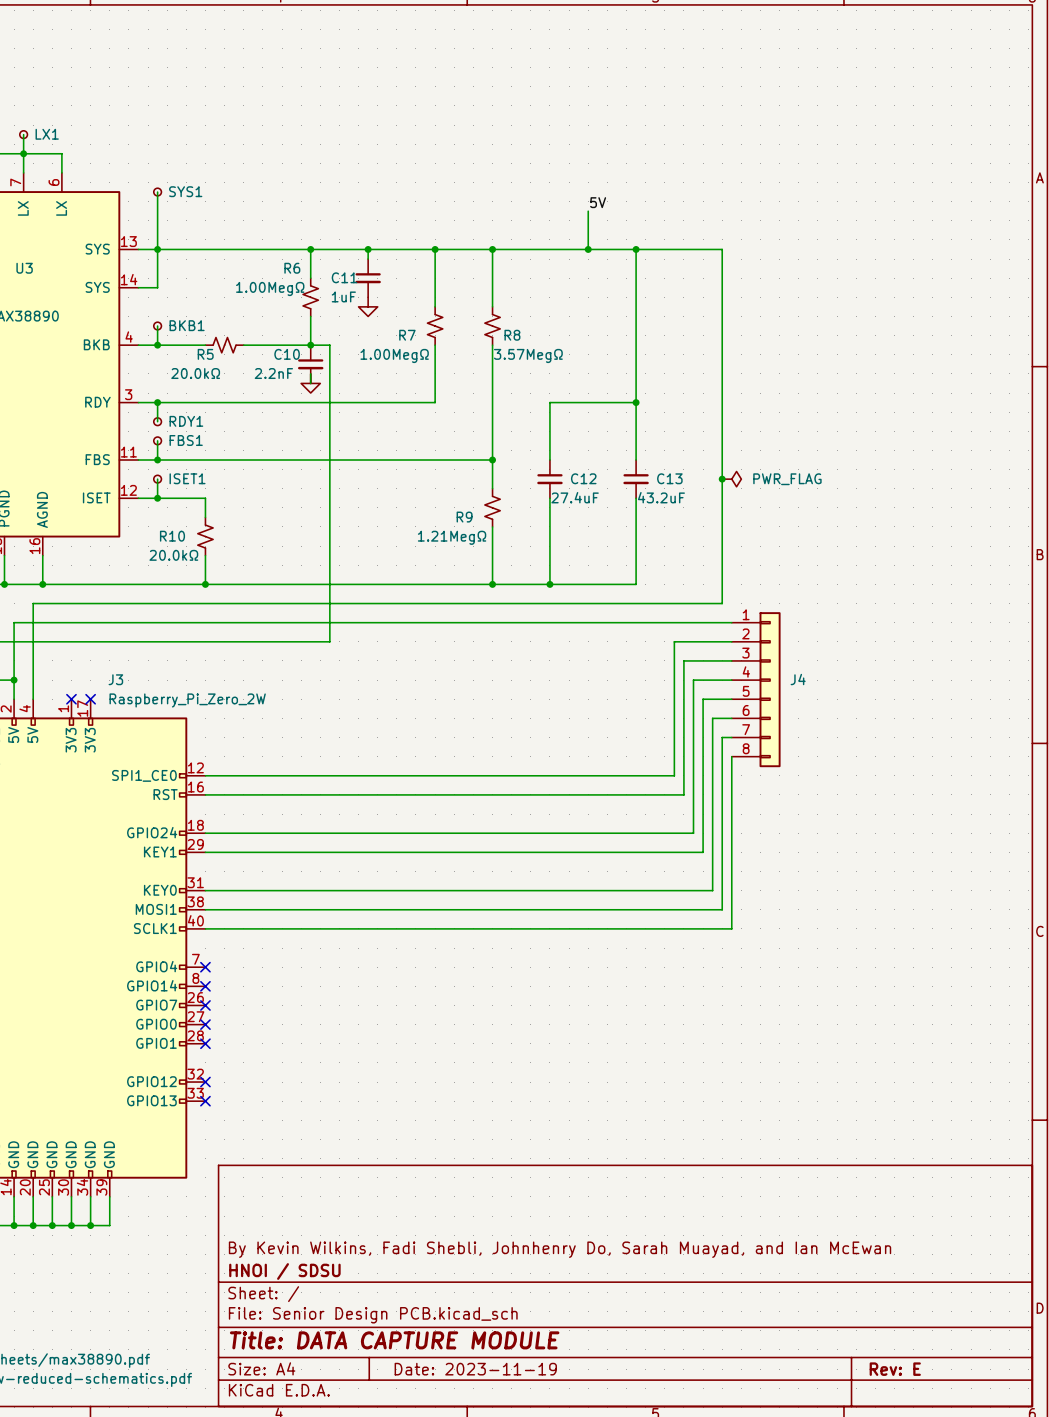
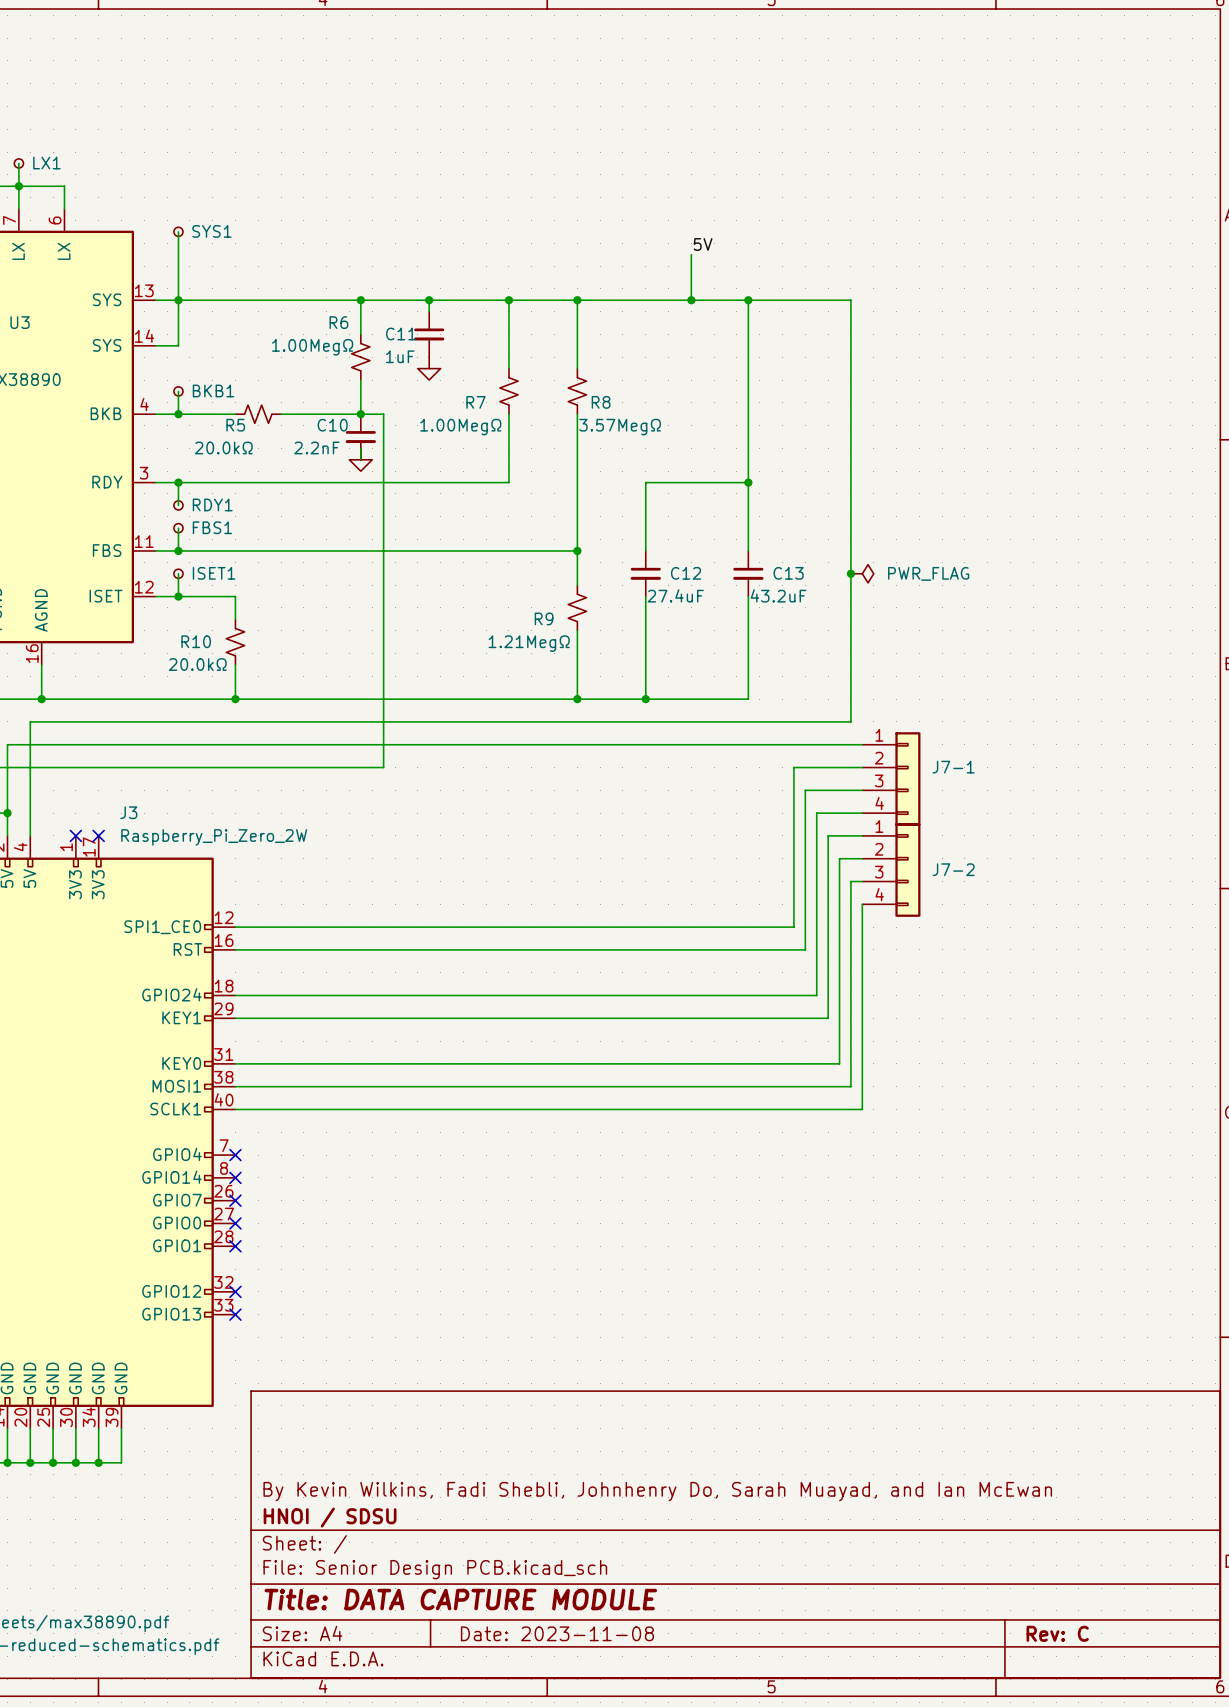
J7-1: none -> (891, 778)
J4: (756, 689) -> none
J7-2: none -> (891, 870)
title block: Date: 2023-11-19 (475, 1369) -> Date: 2023-11-08 (557, 1633)
title block: Rev: E (895, 1369) -> Rev: C (1057, 1633)

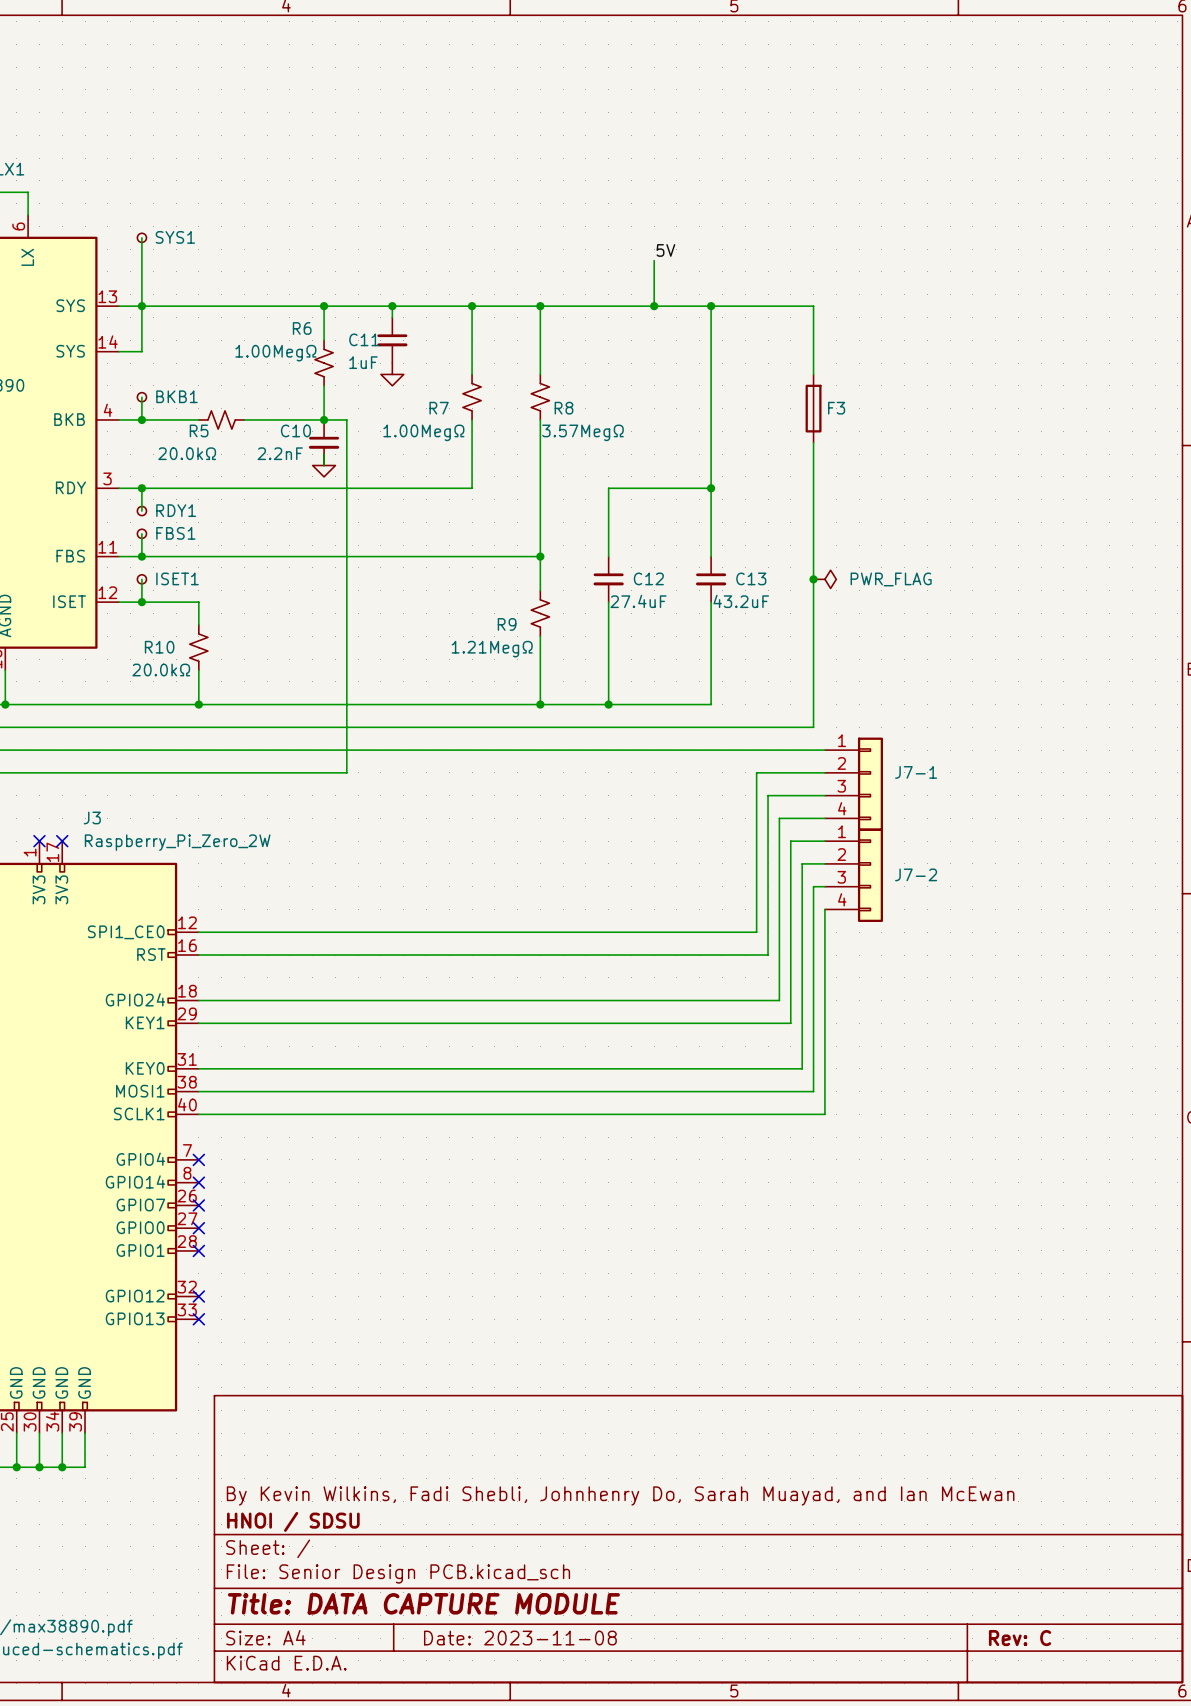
F3: none -> (813, 408)

